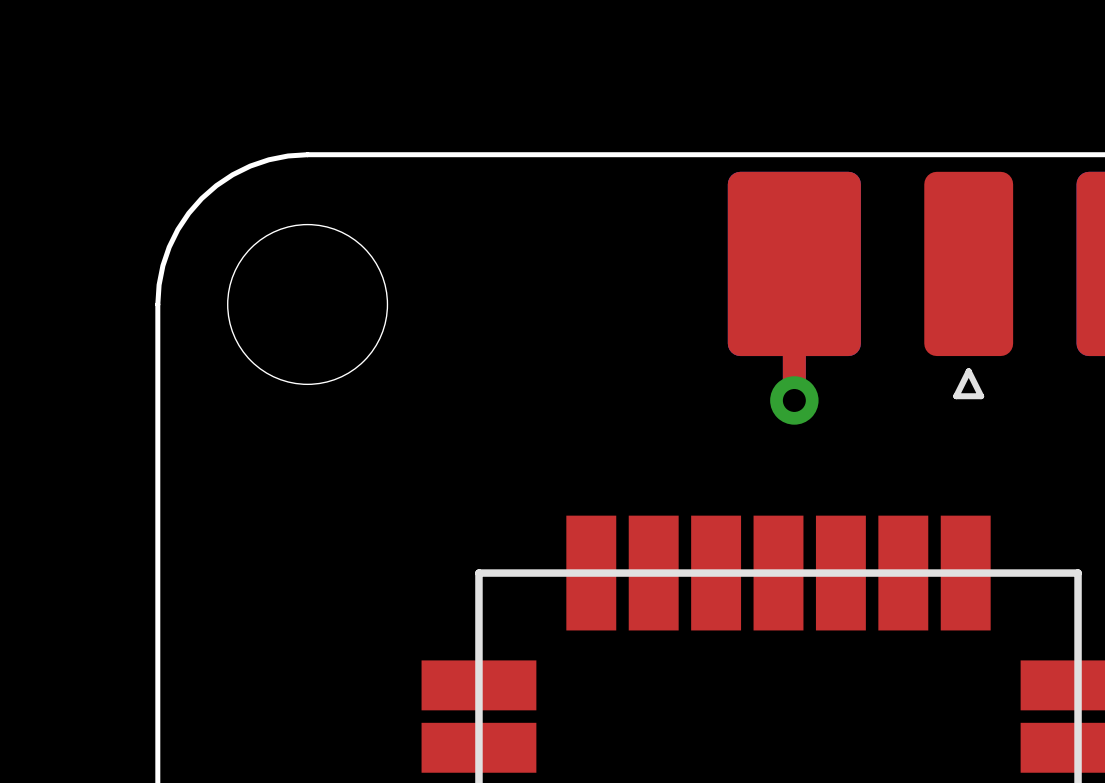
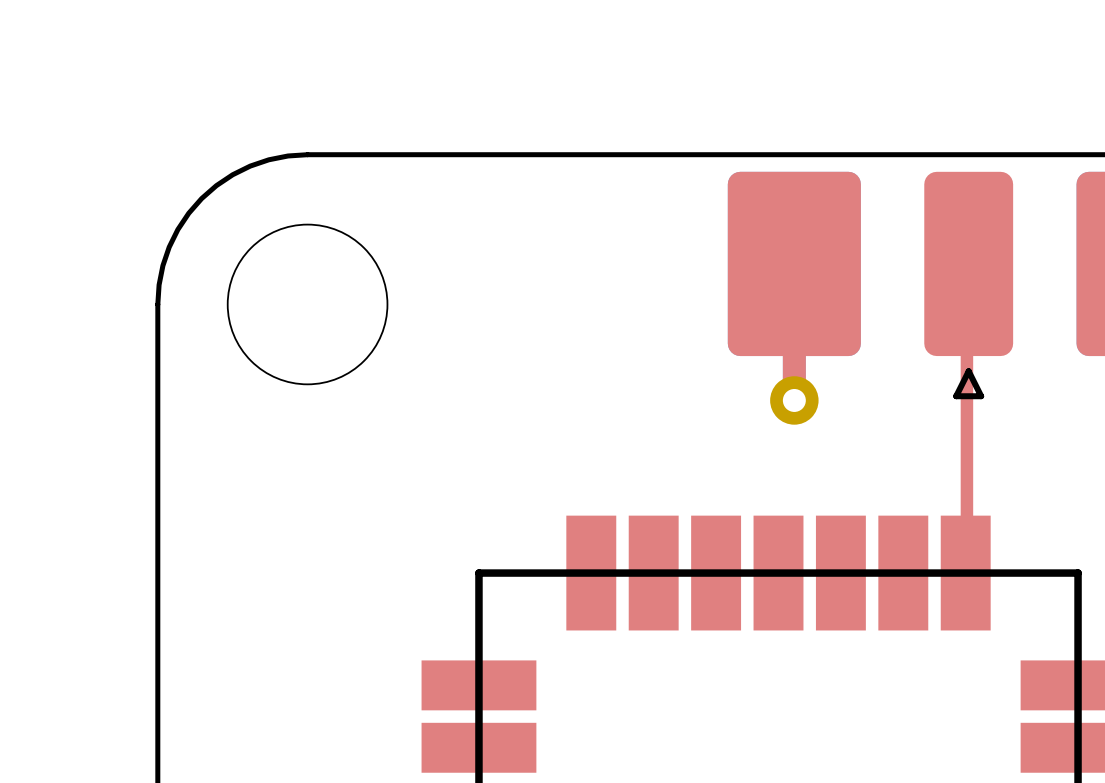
top track: none -> (966, 263) (965, 573)

